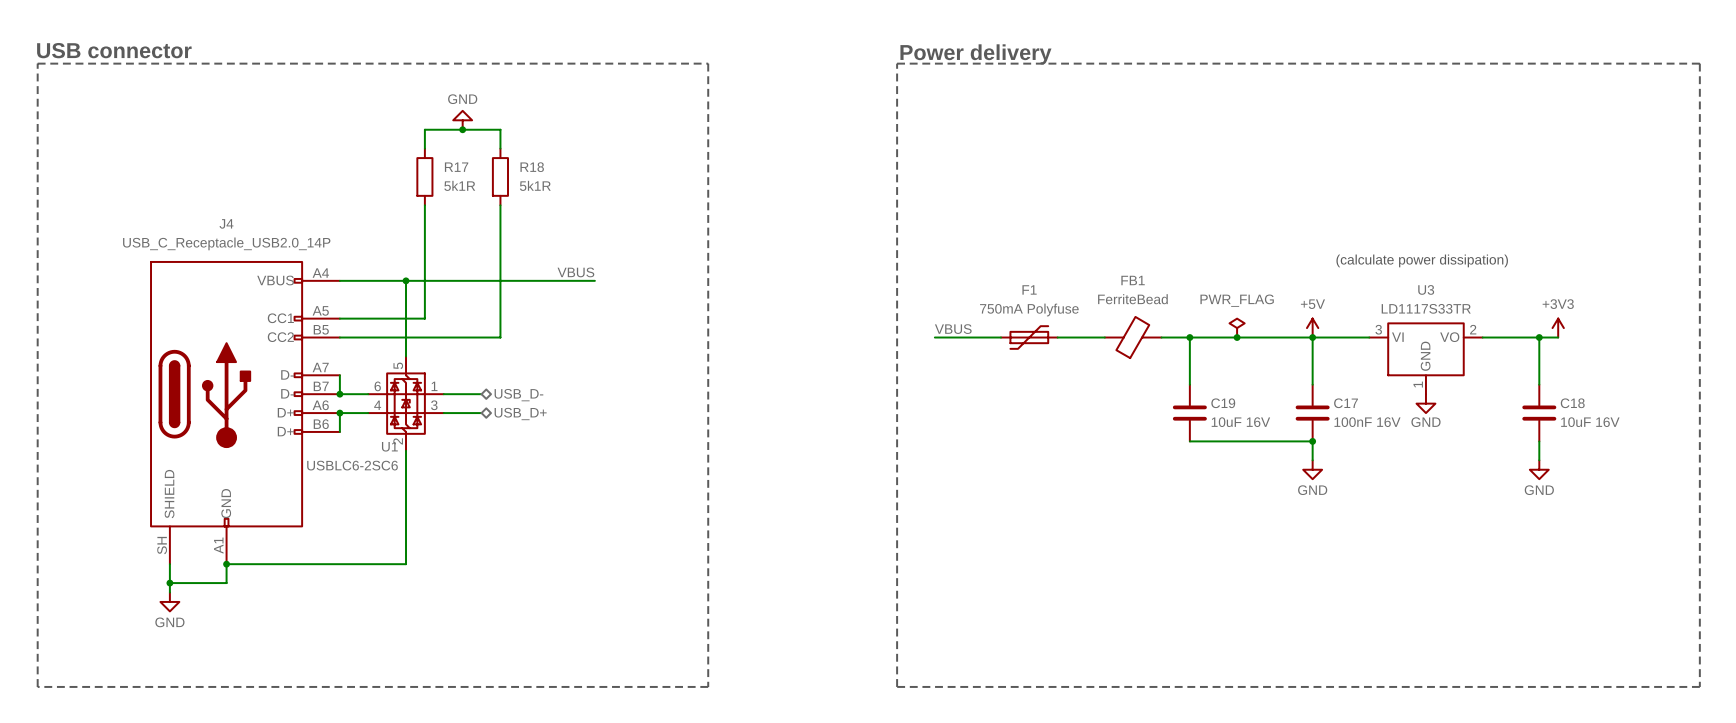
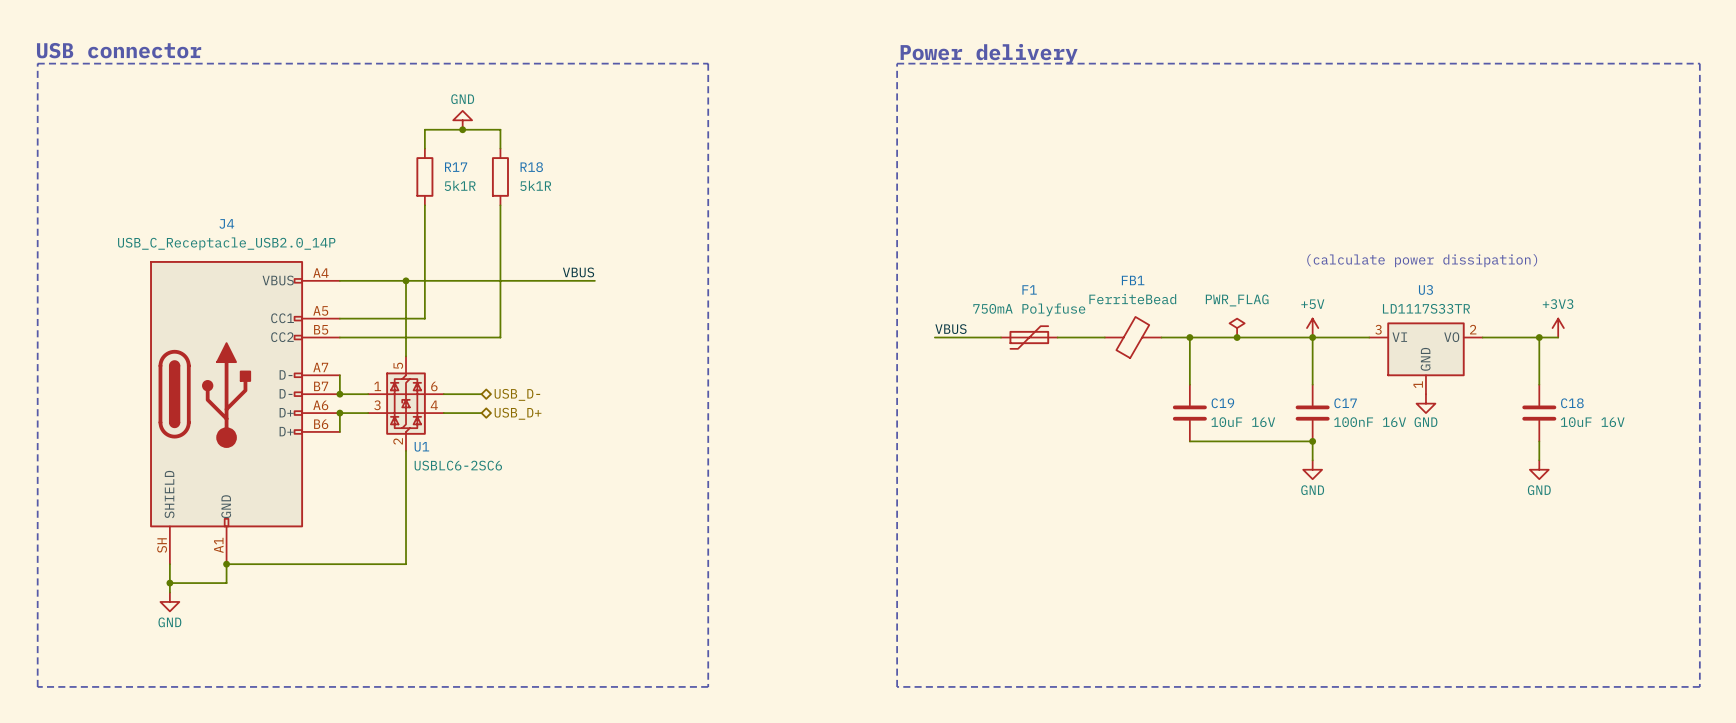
U1 flip: as is (406, 403) -> left-right (406, 403)

